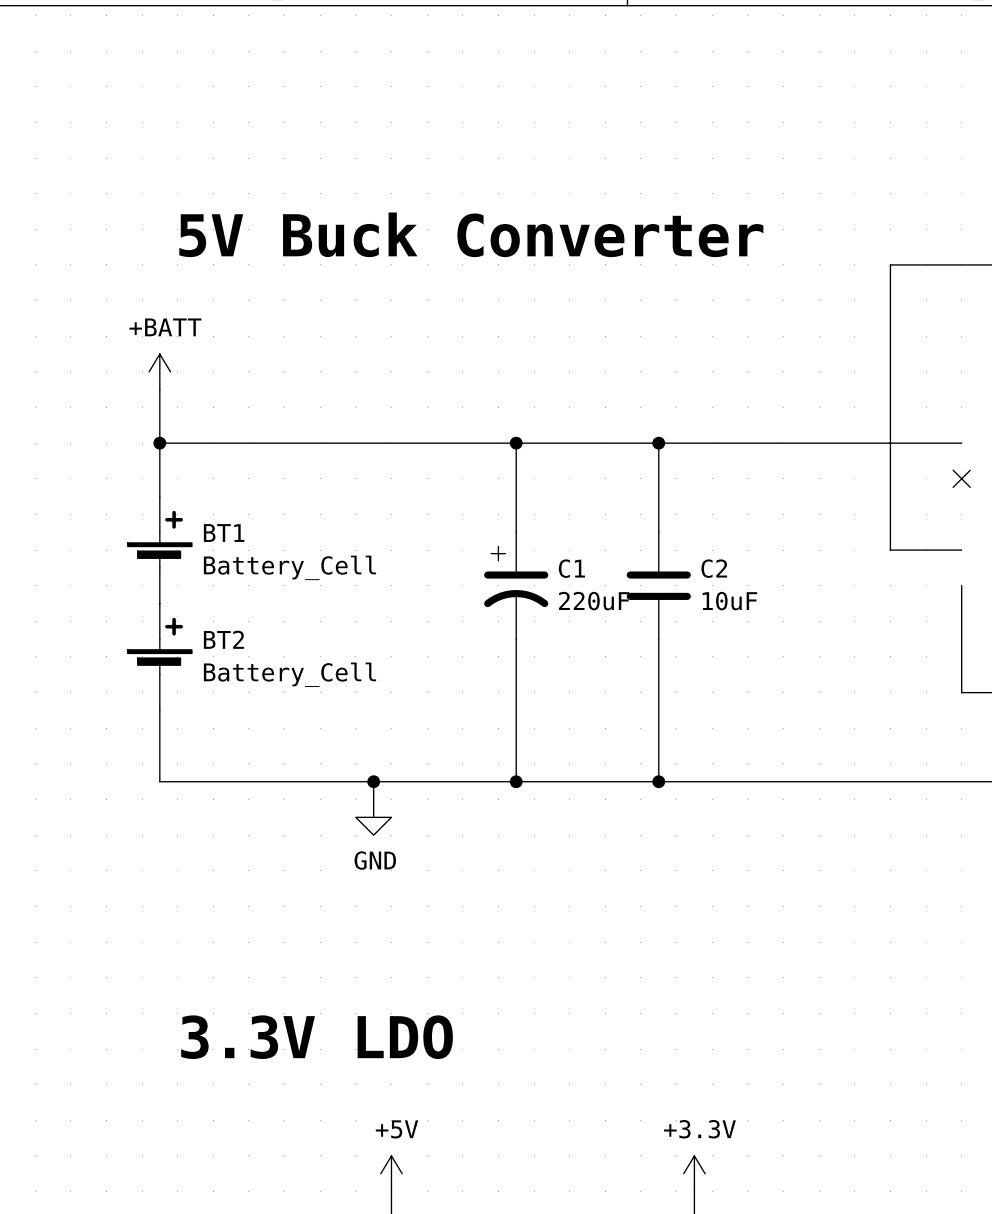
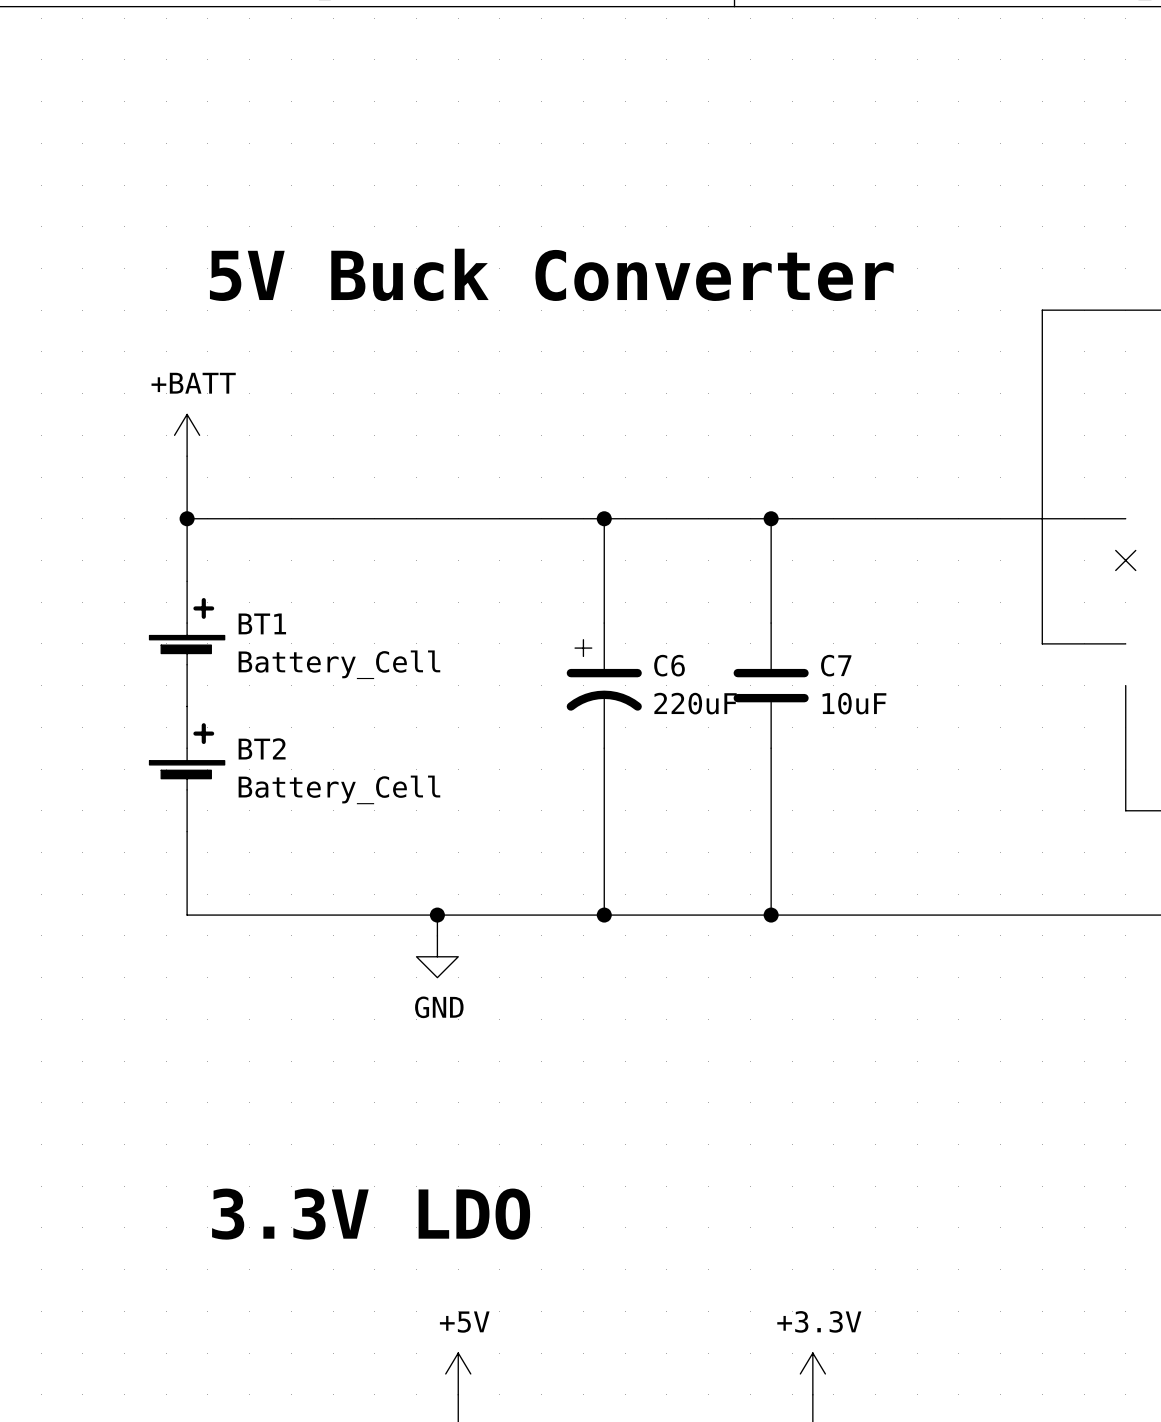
C1 name: C1 (571, 568) -> C6 (669, 665)
C2 name: C2 (714, 568) -> C7 (836, 665)

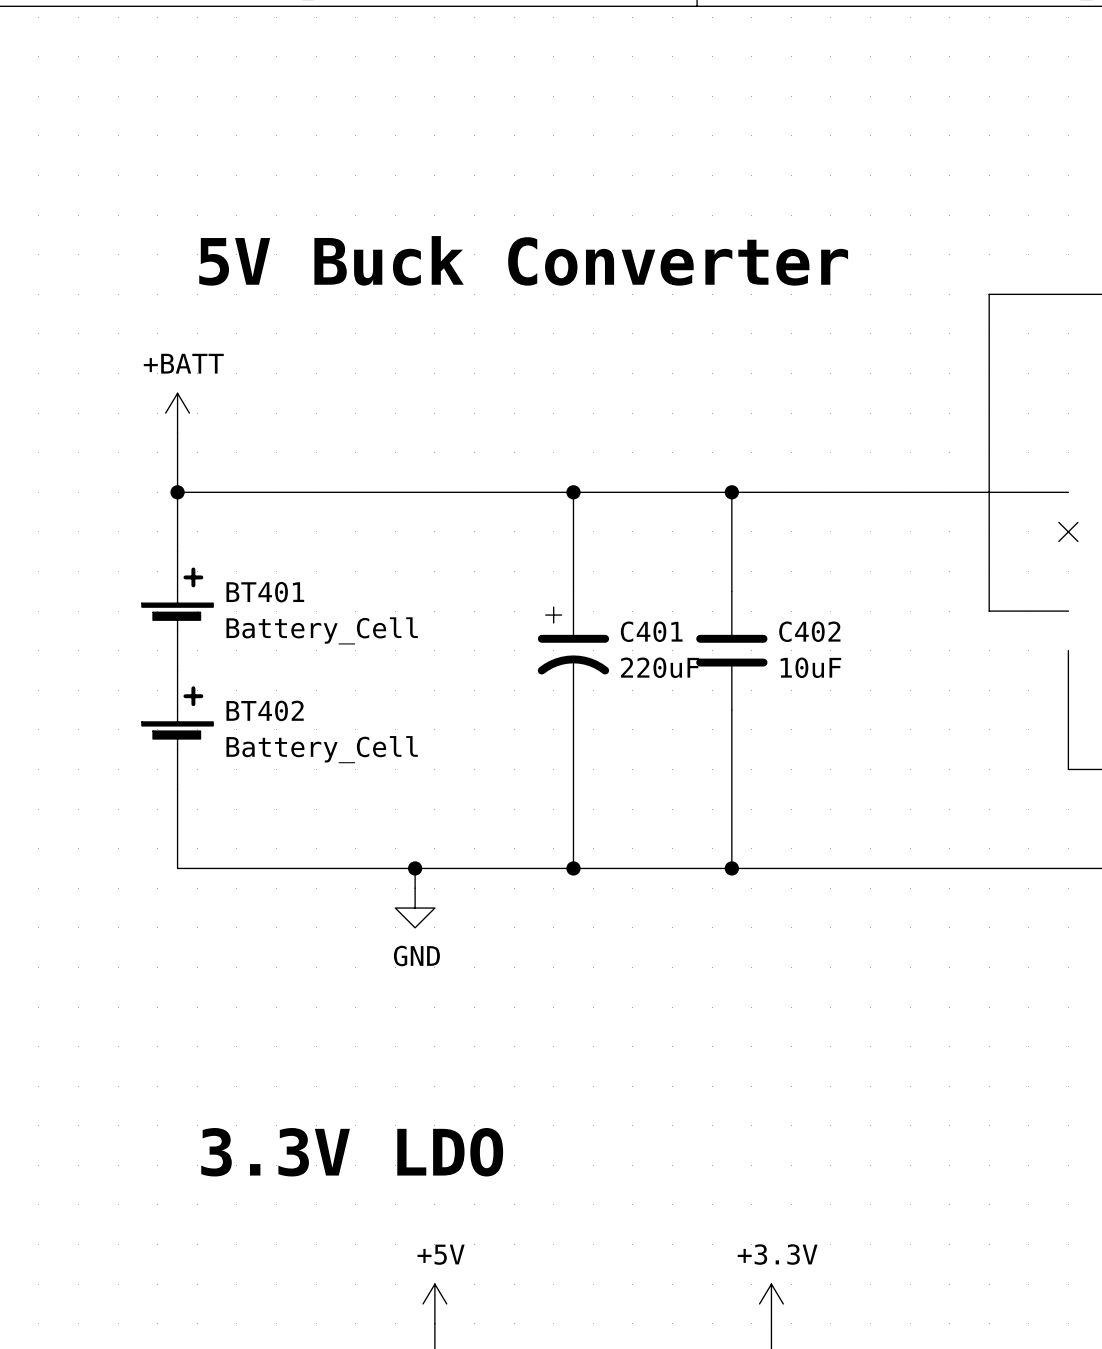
BT1 name: BT1 (262, 623) -> BT401 (265, 592)
C6 name: C6 (669, 665) -> C401 (651, 631)
C7 name: C7 (836, 665) -> C402 (809, 631)
BT2 name: BT2 (262, 748) -> BT402 (265, 710)

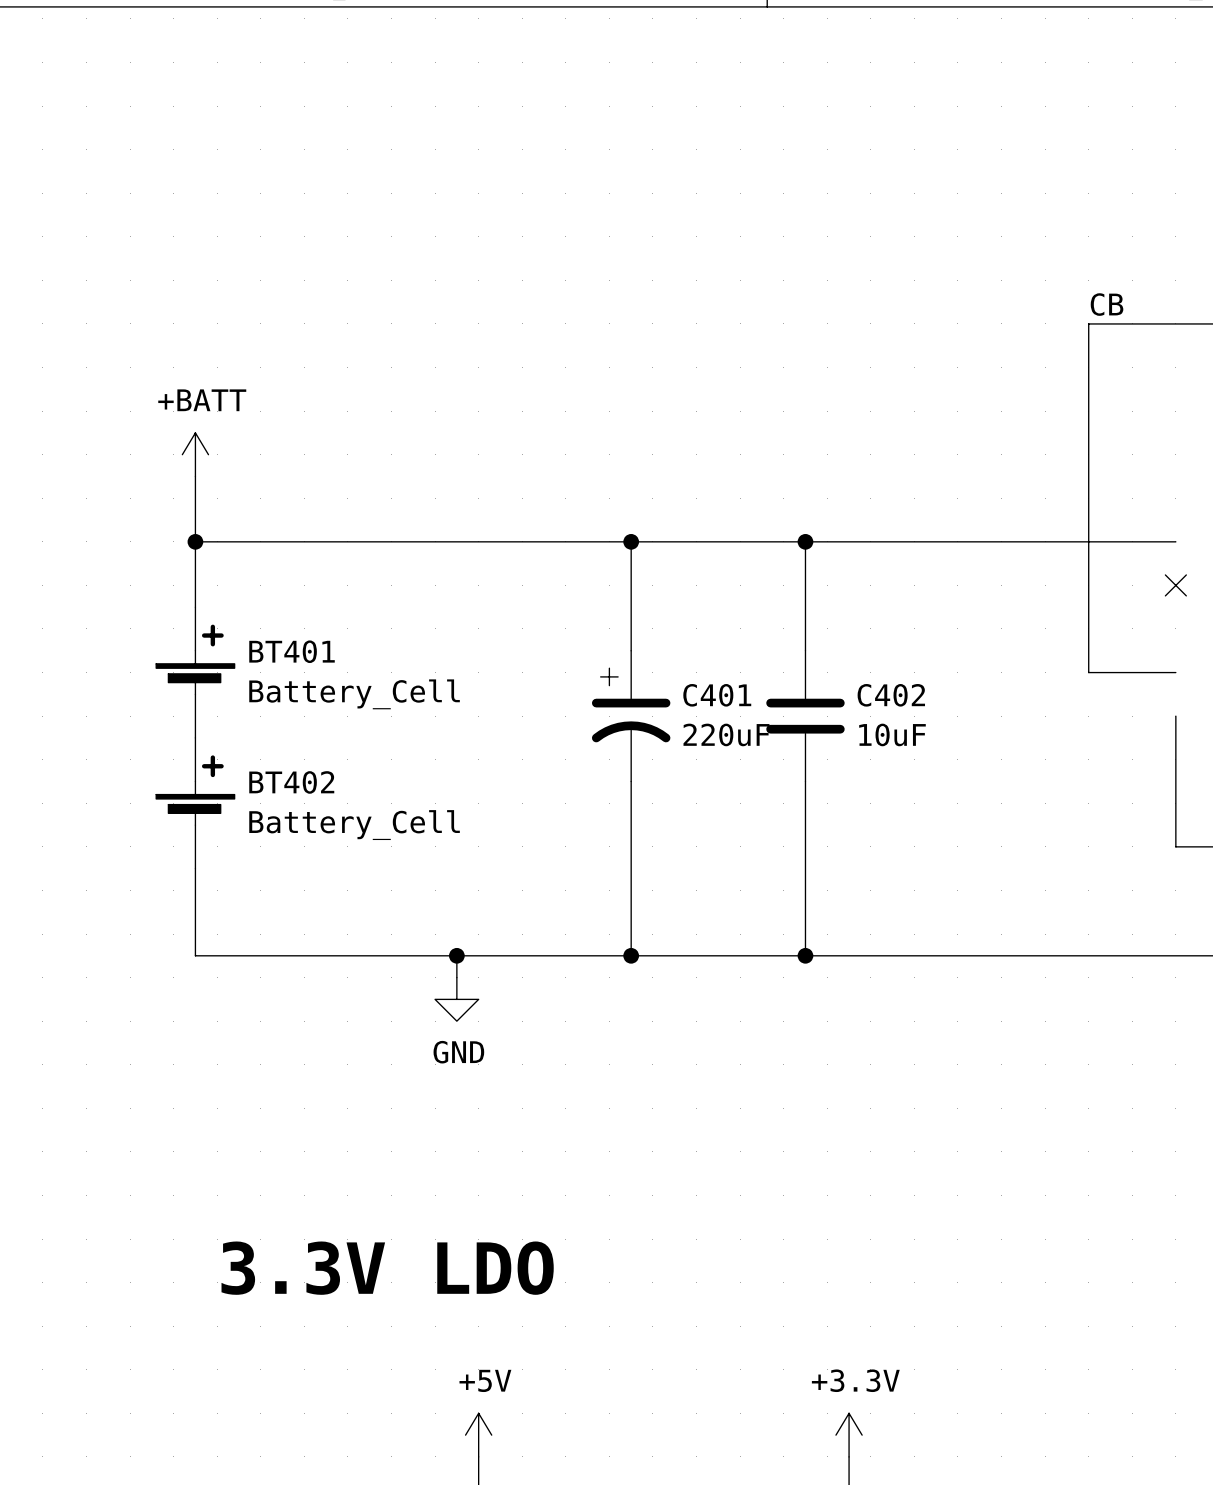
text: 5V Buck Converter (523, 260) -> none
label: none -> CB (1107, 304)

